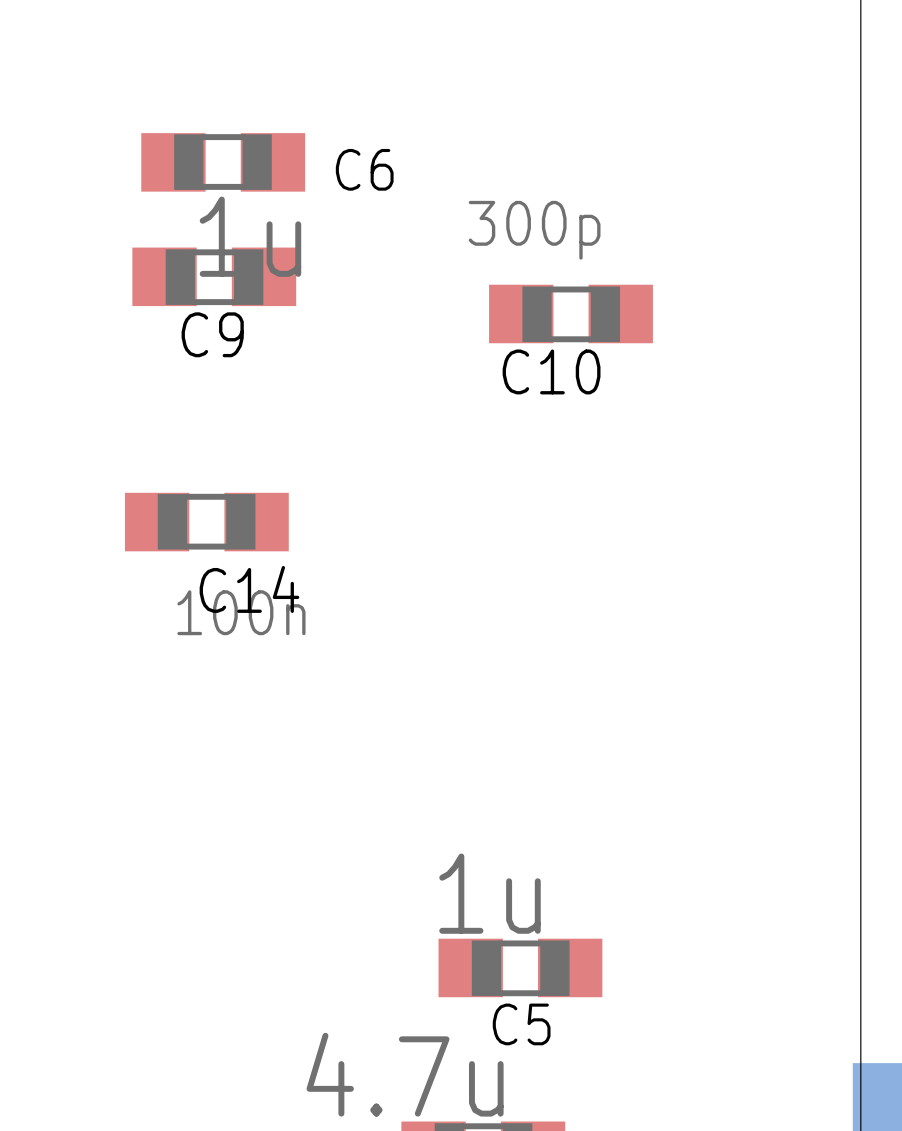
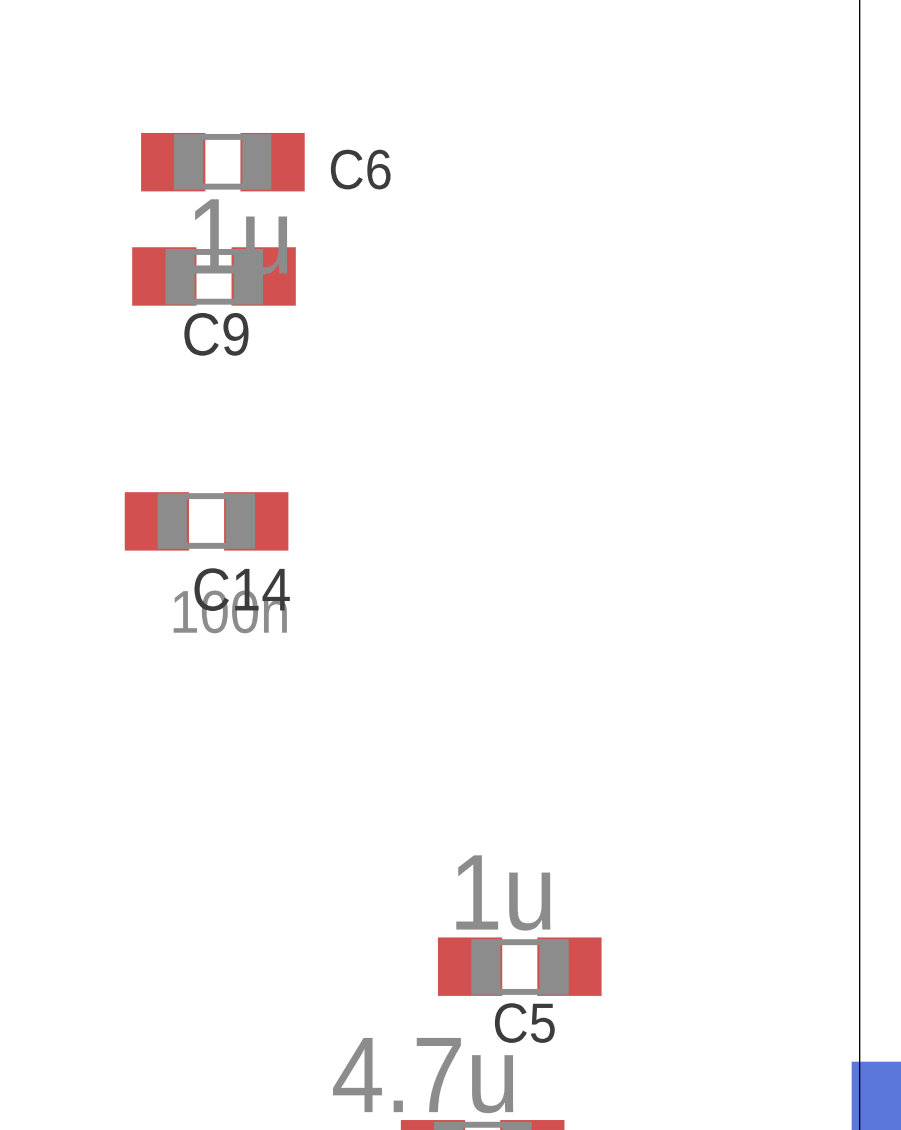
C10: 300p (570, 313) -> none

